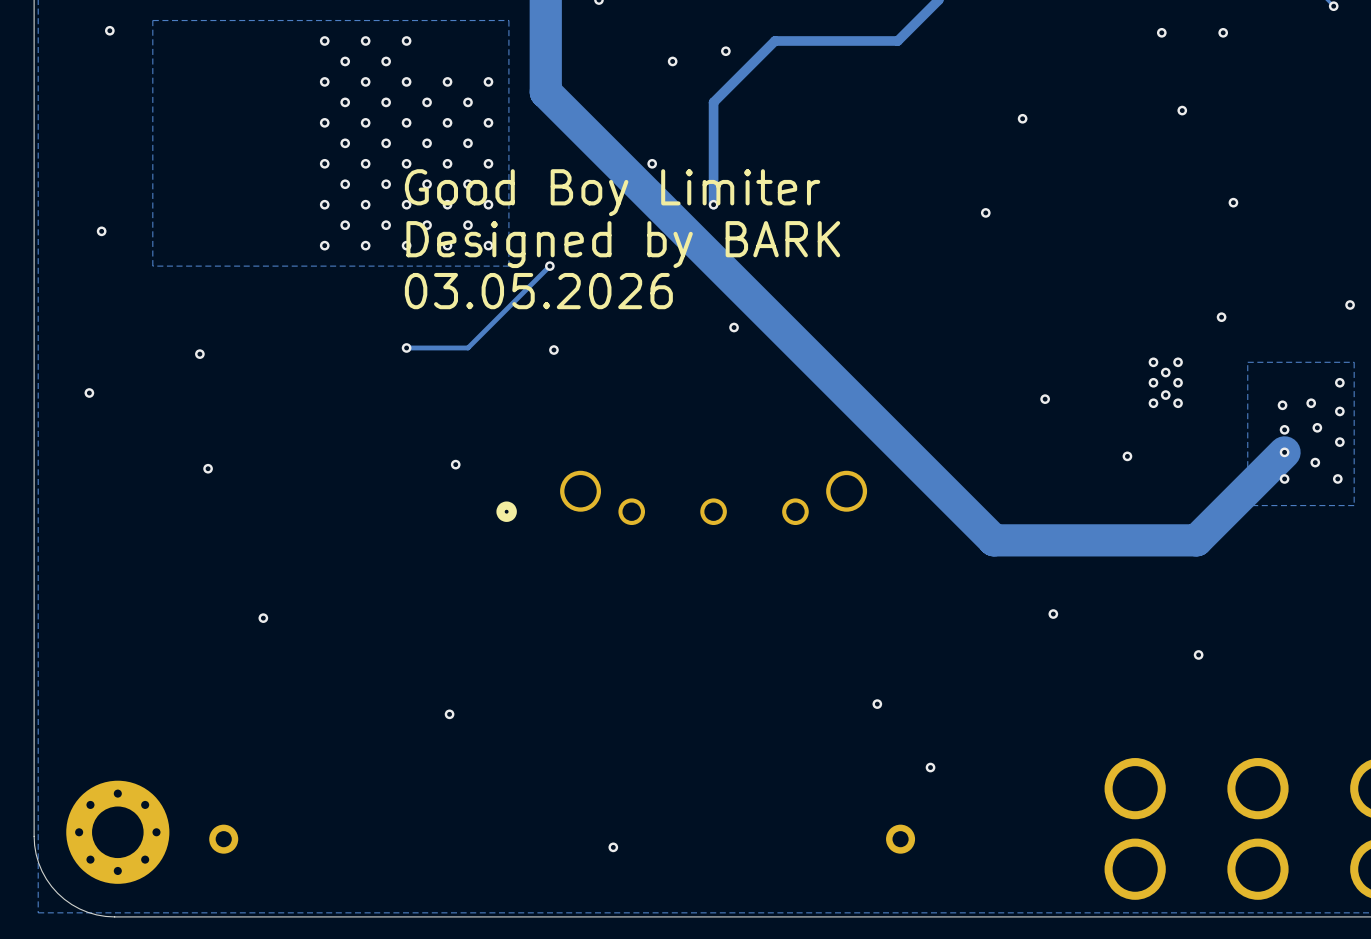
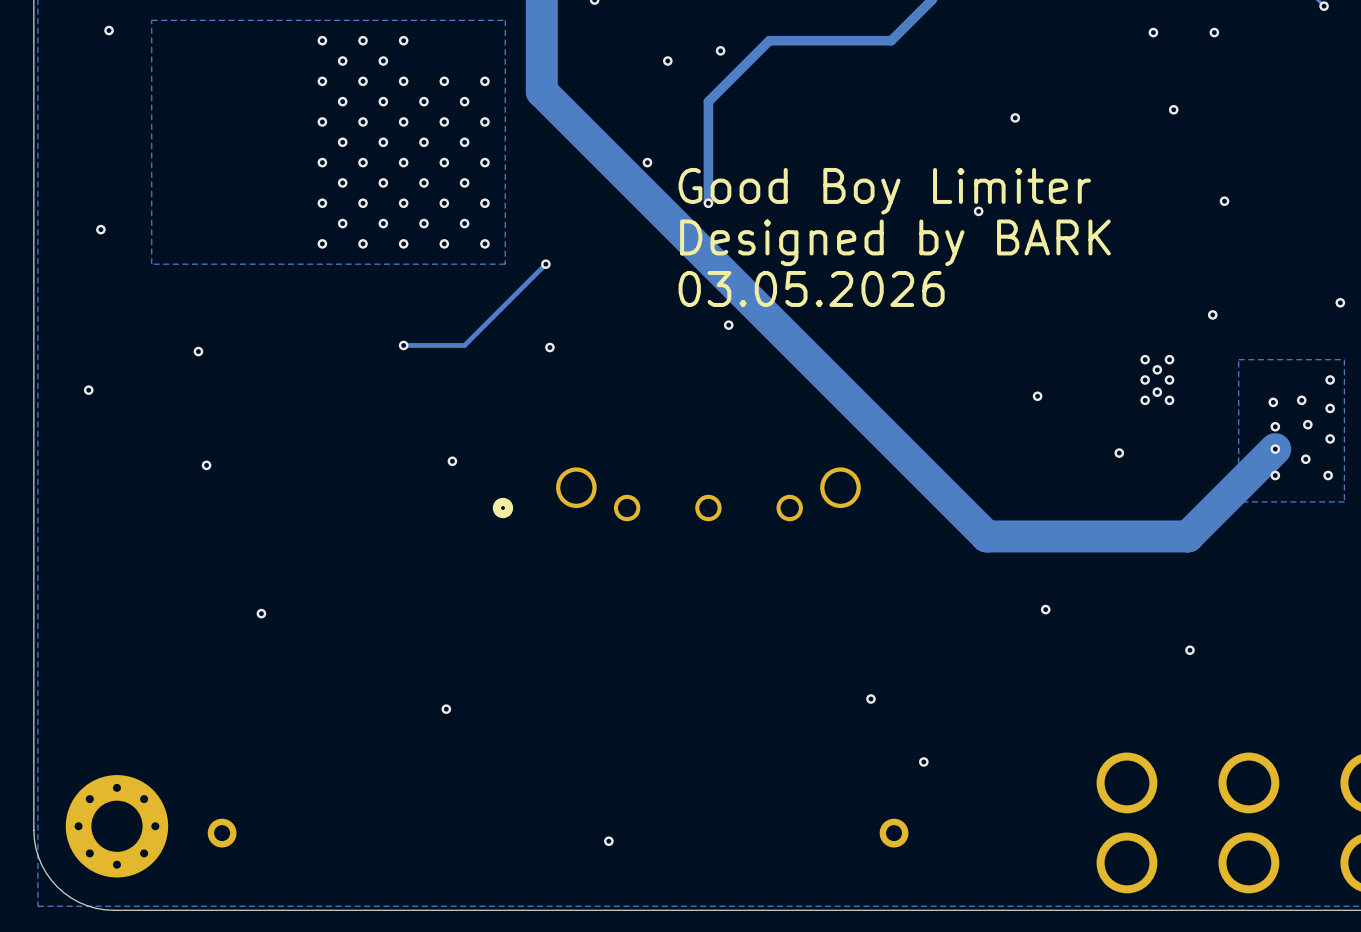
text position: Good Boy Limiter (612, 192) -> Good Boy Limiter (884, 191)
text position: Designed by BARK (623, 244) -> Designed by BARK (895, 242)
text position: 03.05.2026 (538, 291) -> 03.05.2026 (811, 288)

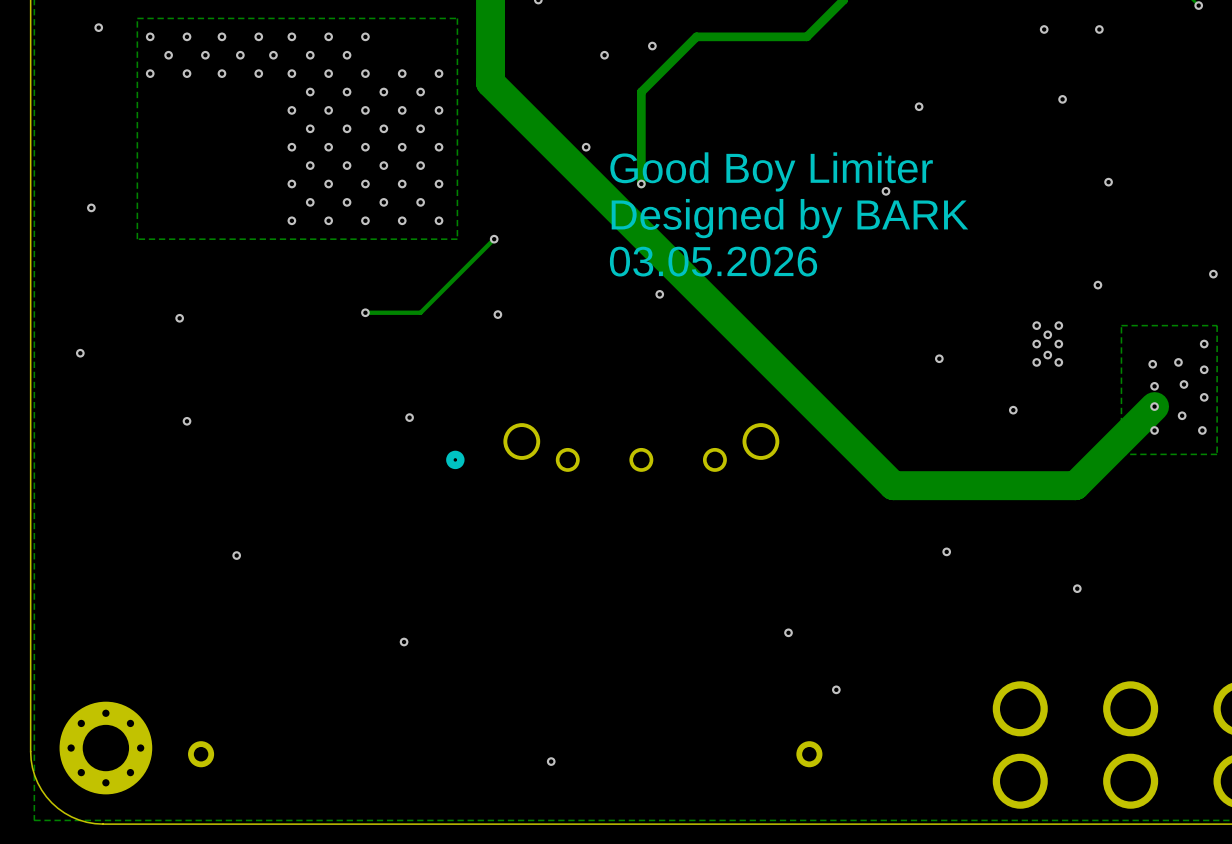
via: none -> (150, 36)
via: none -> (187, 36)
via: none -> (221, 36)
via: none -> (258, 36)
via: none -> (168, 55)
via: none -> (205, 55)
via: none -> (240, 55)
via: none -> (273, 55)
via: none -> (150, 73)
via: none -> (187, 73)
via: none -> (221, 73)
via: none -> (258, 73)

